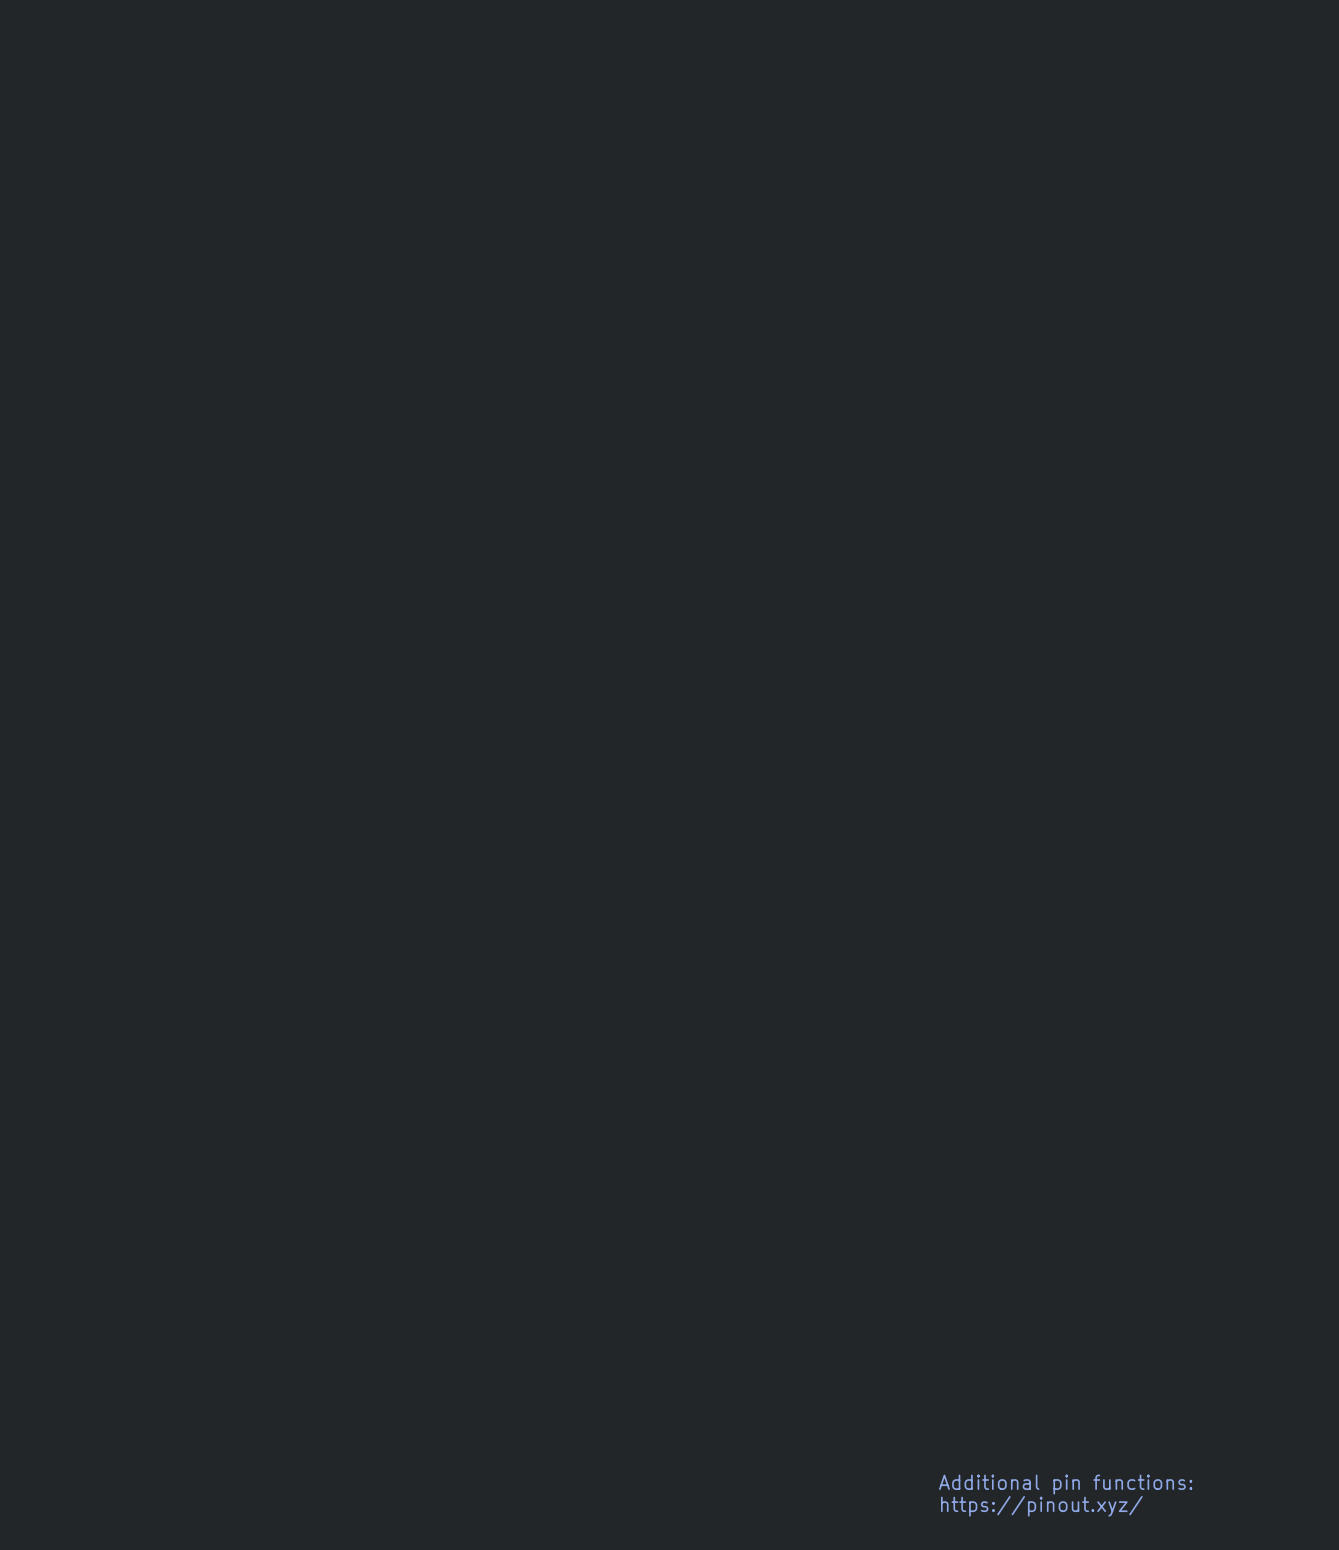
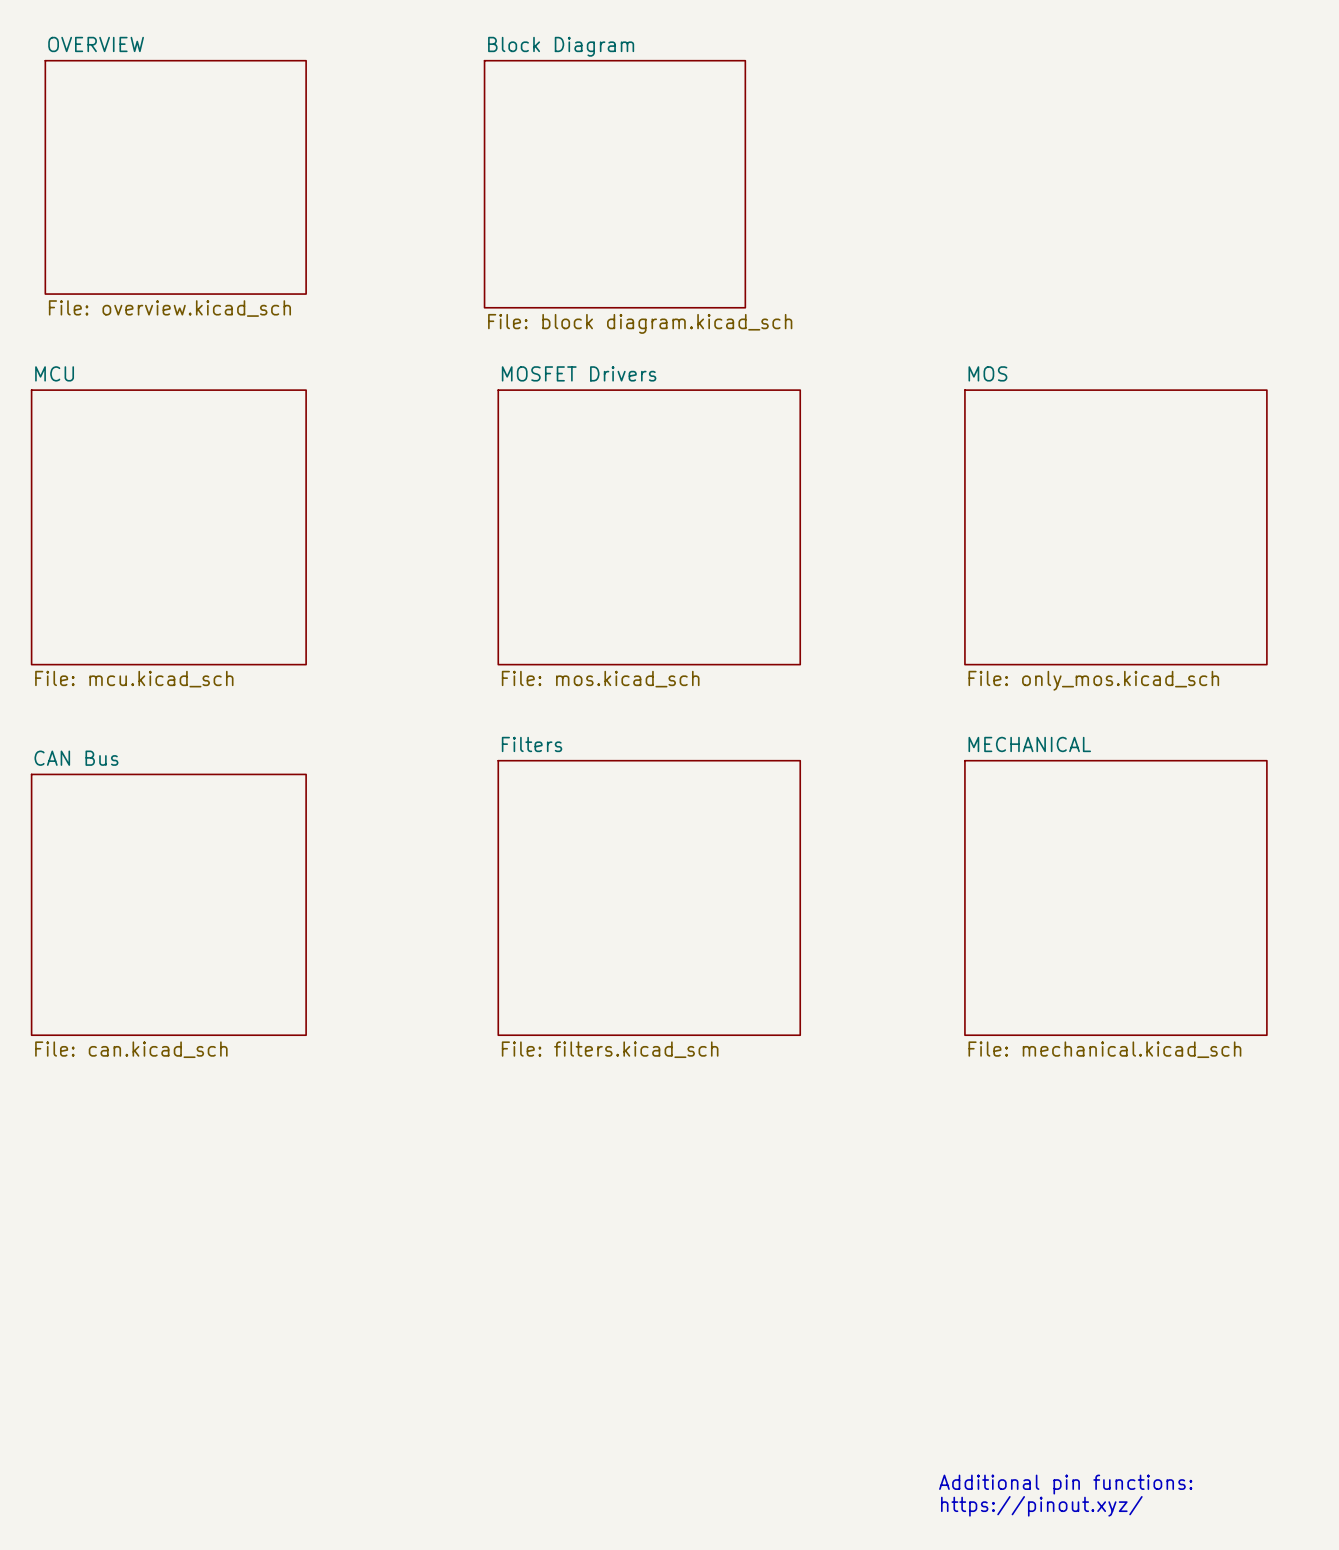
sheet OVERVIEW: none -> File: overview.kicad_sch (175, 177)
sheet Block Diagram: none -> File: block diagram.kicad_sch (614, 184)
sheet MCU: none -> File: mcu.kicad_sch (168, 527)
sheet MOSFET Drivers: none -> File: mos.kicad_sch (649, 527)
sheet MOS: none -> File: only_mos.kicad_sch (1115, 527)
sheet Filters: none -> File: filters.kicad_sch (649, 897)
sheet MECHANICAL: none -> File: mechanical.kicad_sch (1115, 897)
sheet CAN Bus: none -> File: can.kicad_sch (168, 904)

